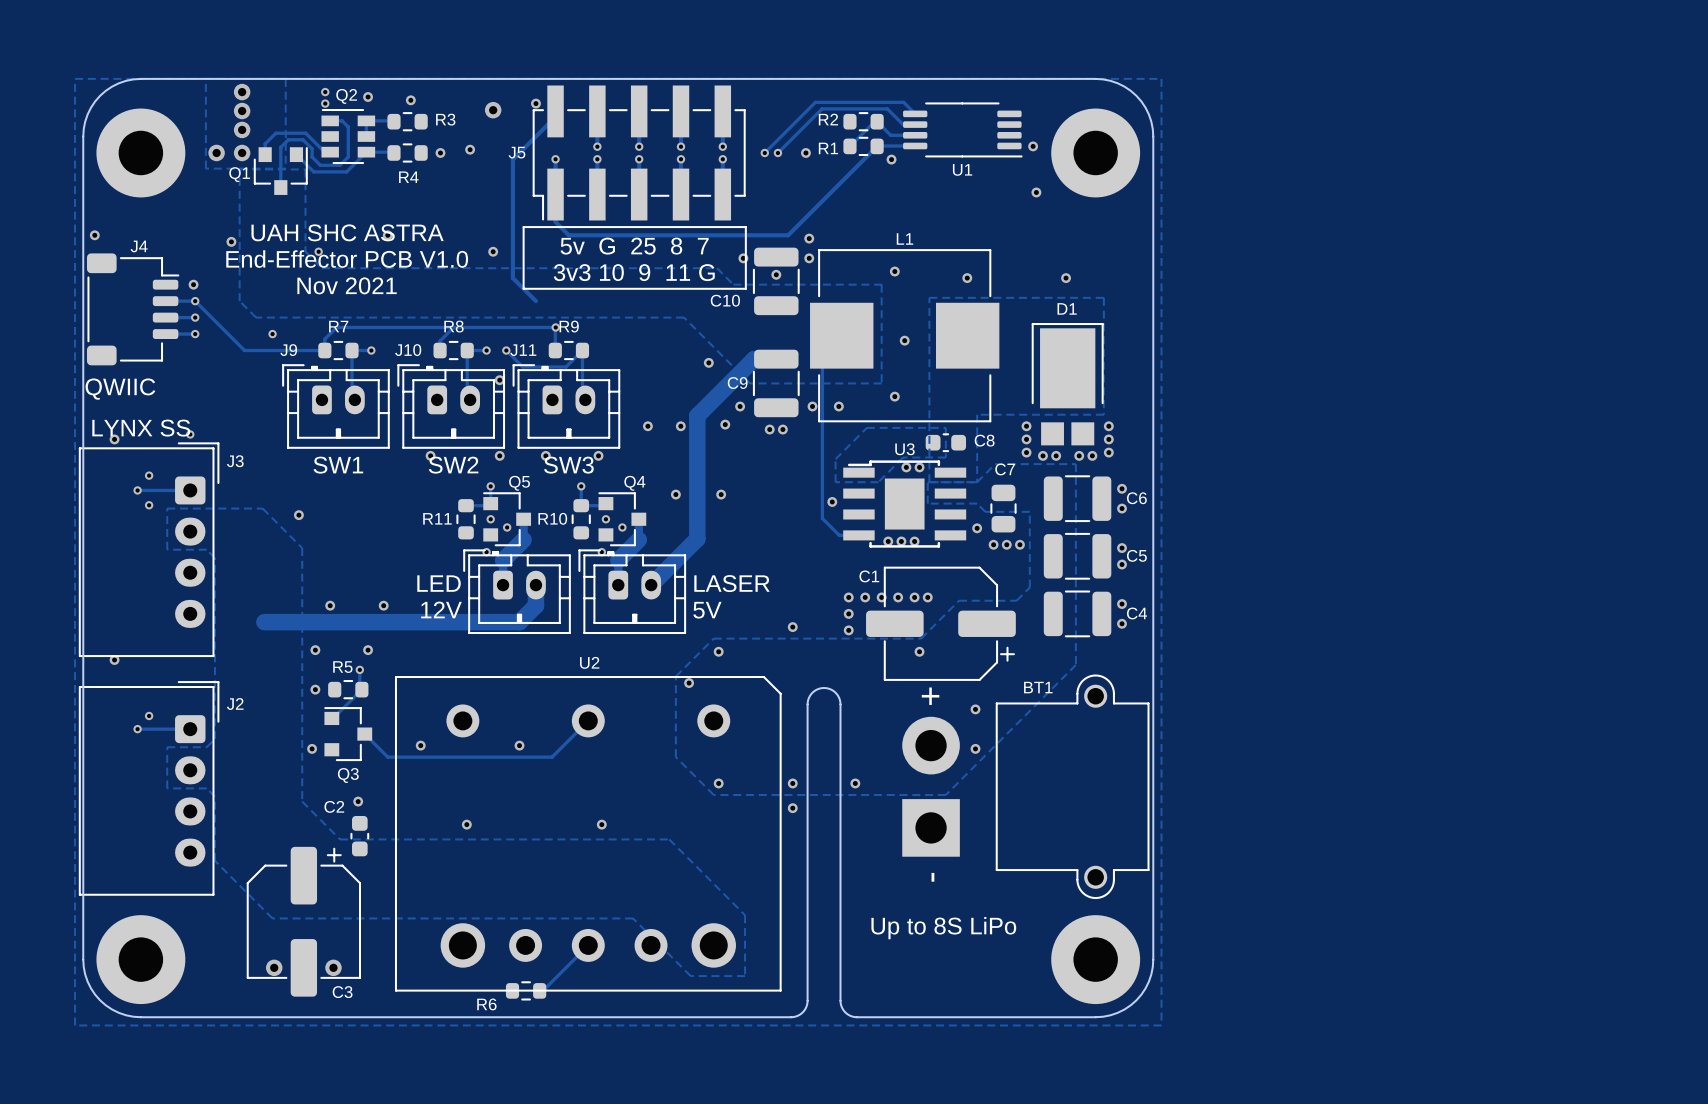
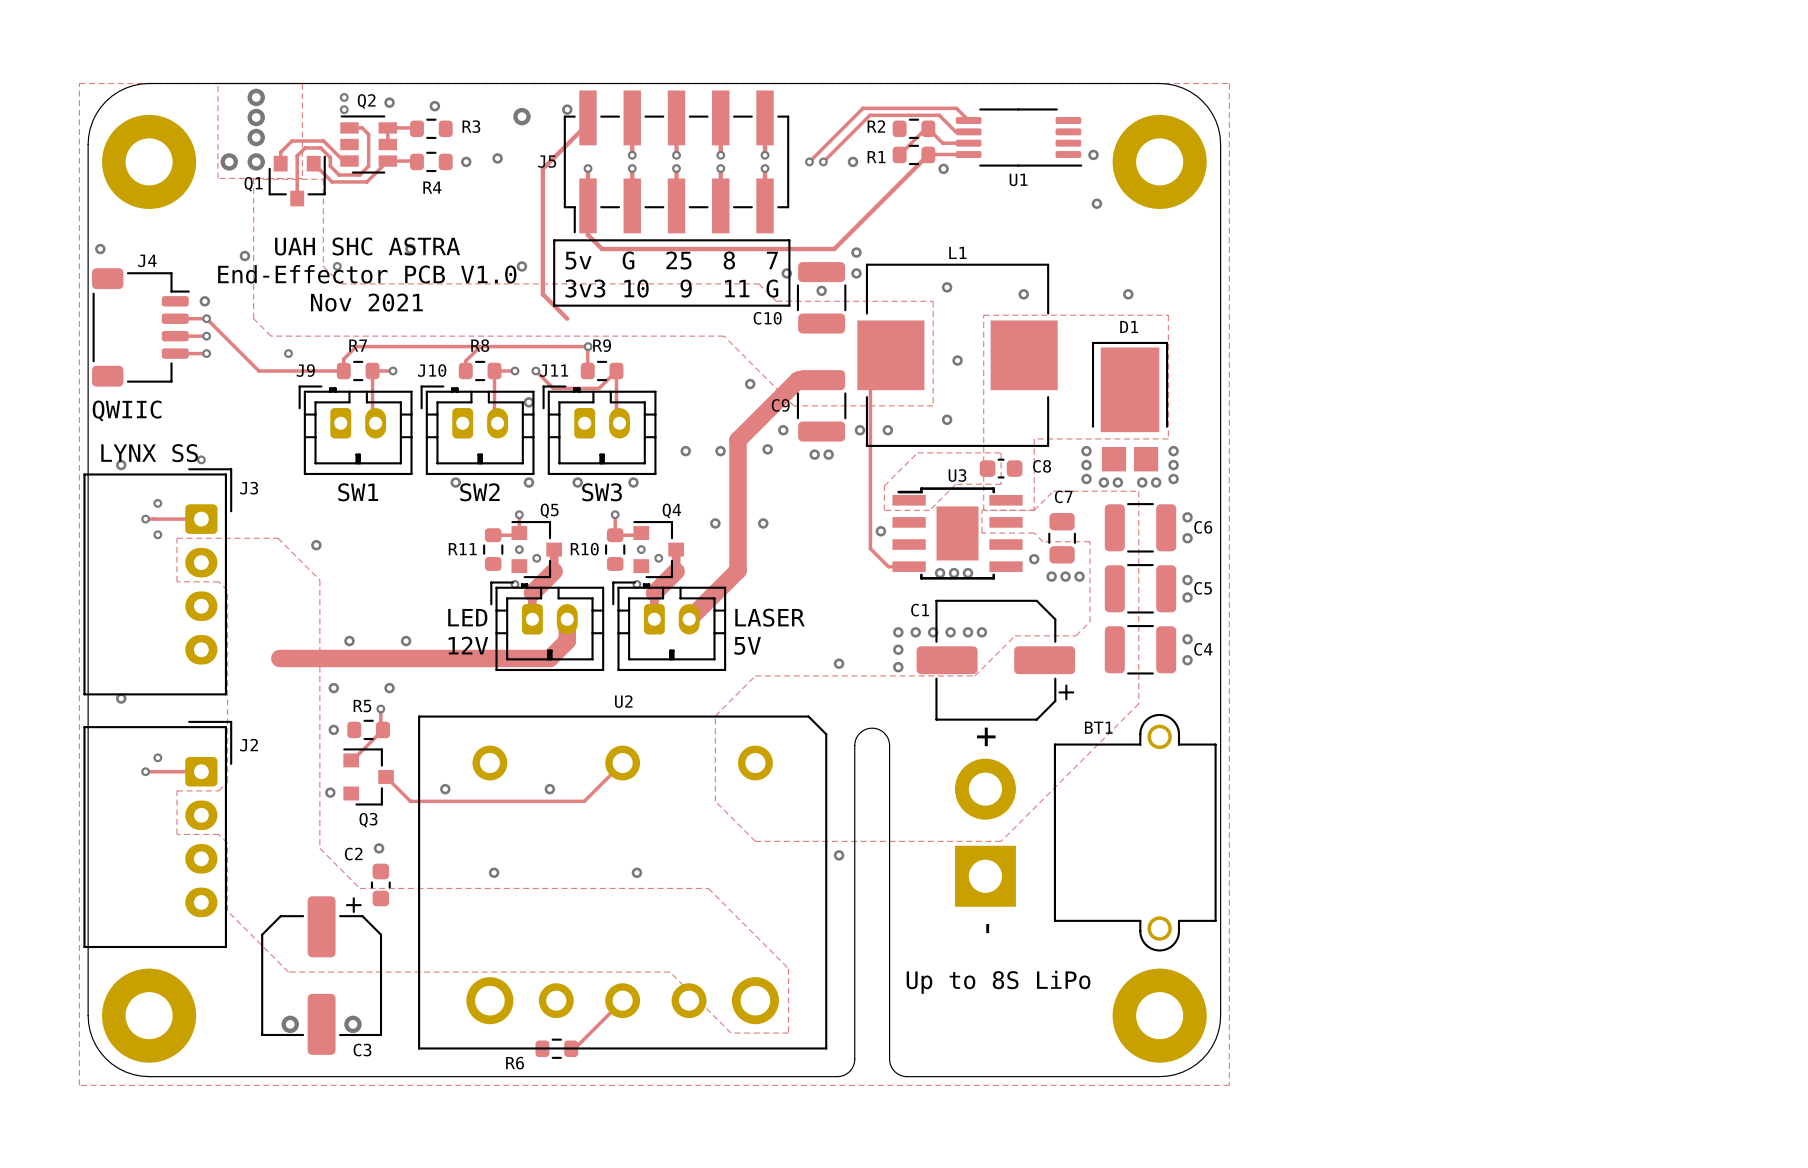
via: (906, 467) -> none
via: (919, 467) -> none
via: (718, 651) -> none
via: (919, 651) -> none
via: (689, 683) -> none
via: (975, 709) -> none
via: (975, 748) -> none
via: (718, 783) -> none
via: (792, 783) -> none
via: (855, 783) -> none

